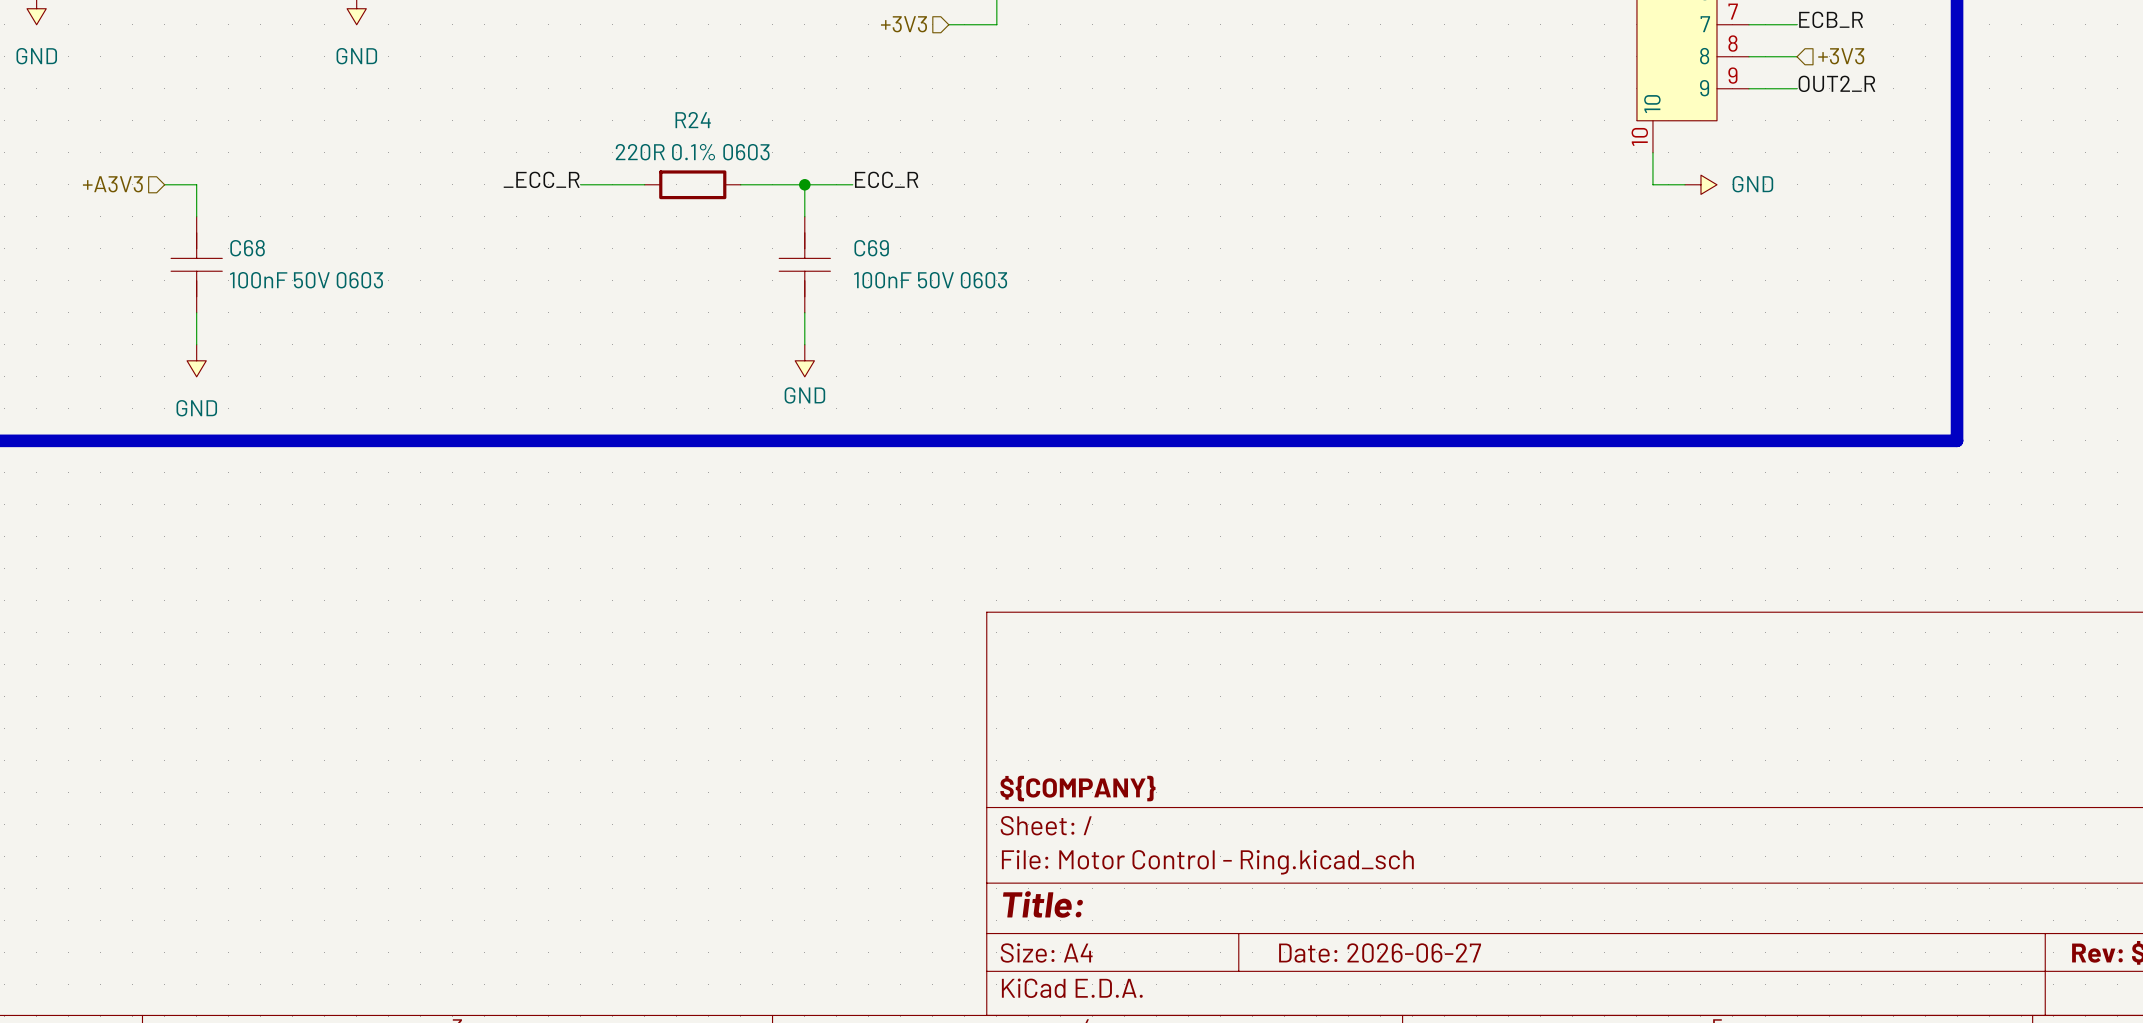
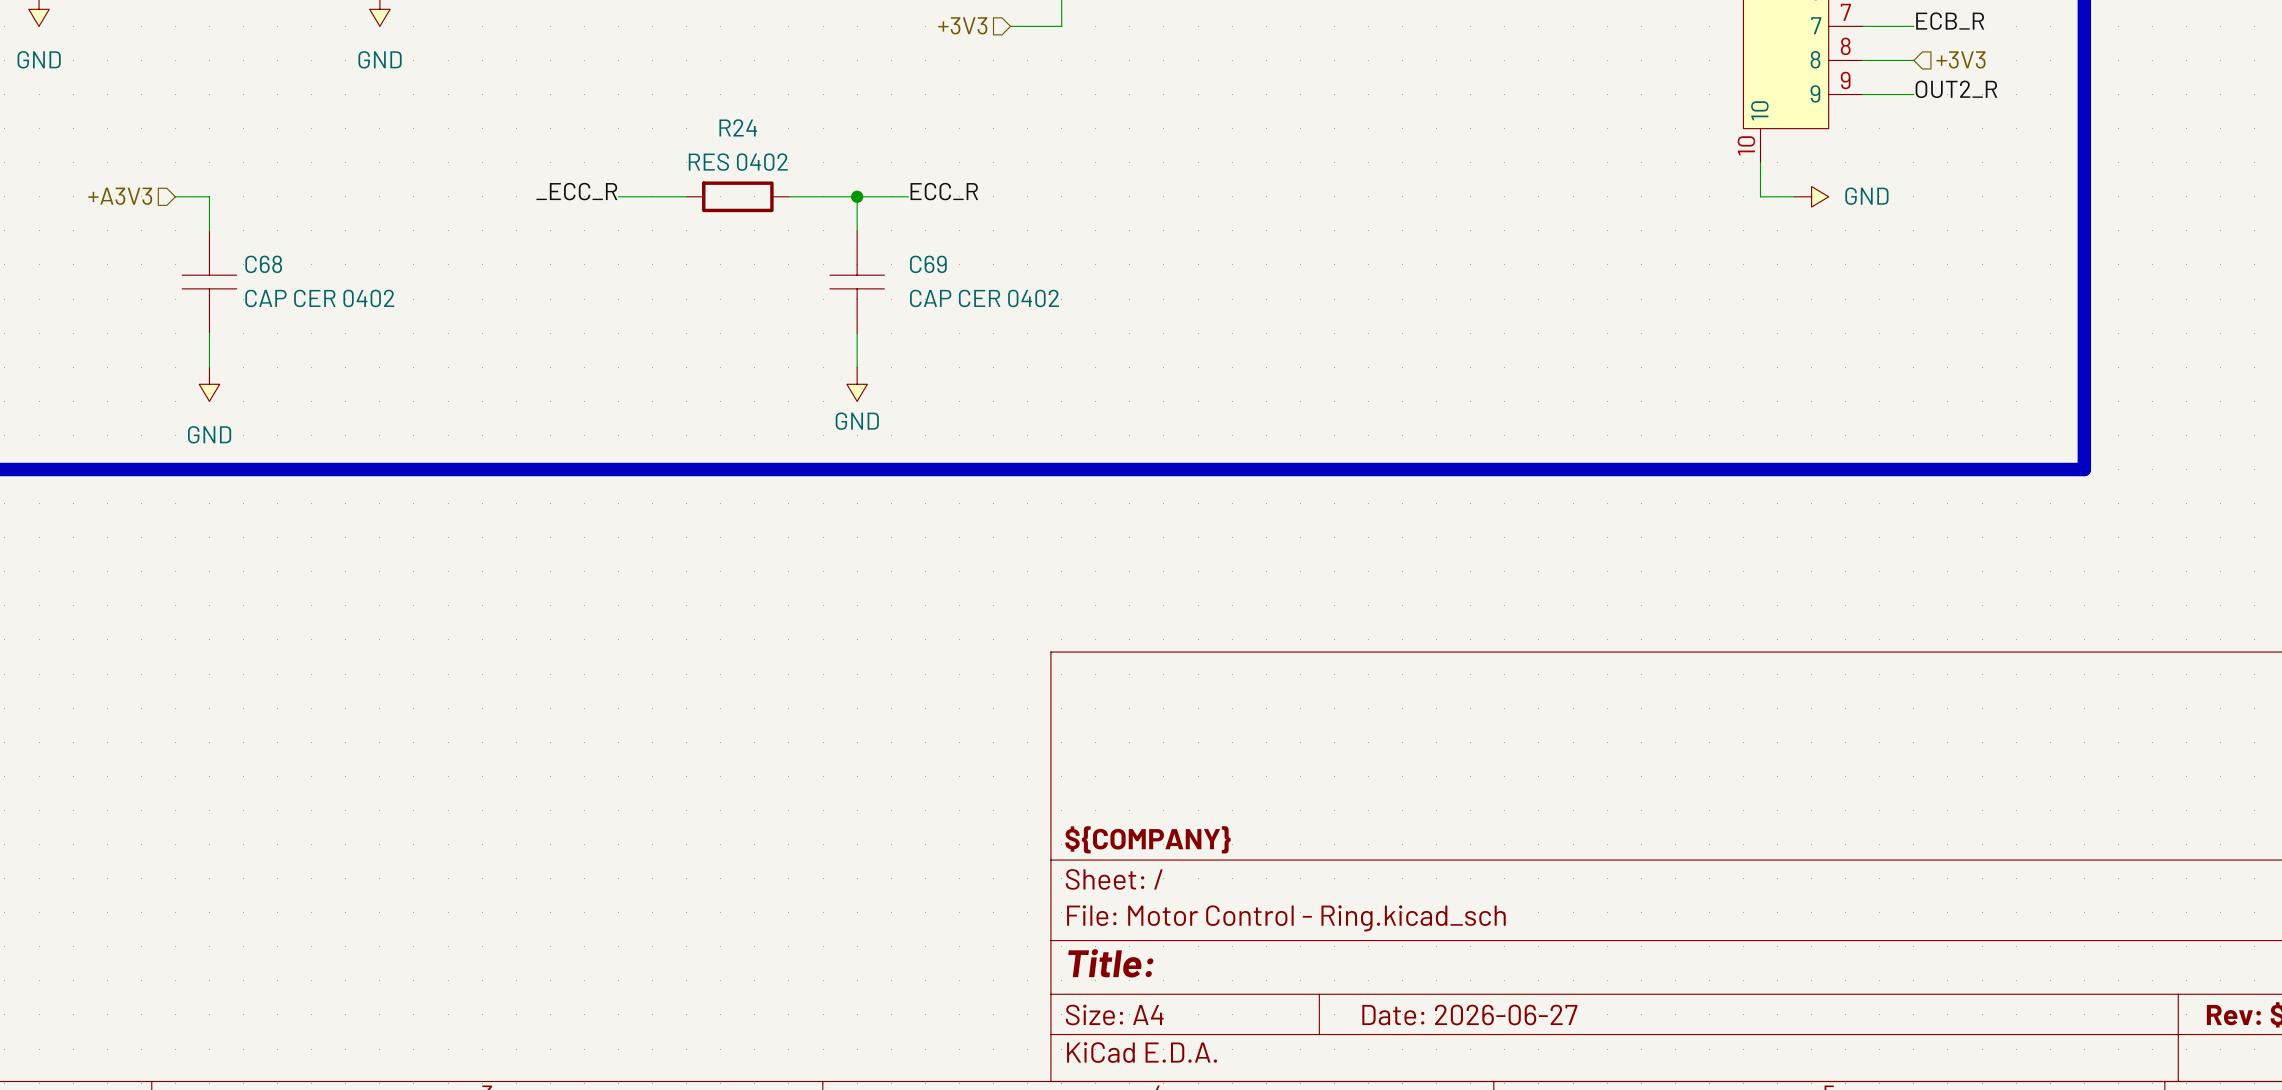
R24 value: 220R 0.1% 0603 (692, 152) -> RES 0402 (738, 162)
C68 symbol: [171, 216, 223, 313] -> [182, 230, 237, 334]
C69 symbol: [779, 216, 831, 313] -> [829, 230, 885, 334]
C68 value: 100nF 50V 0603 (306, 280) -> CAP CER 0402 (319, 298)
C69 value: 100nF 50V 0603 (930, 280) -> CAP CER 0402 (984, 298)

